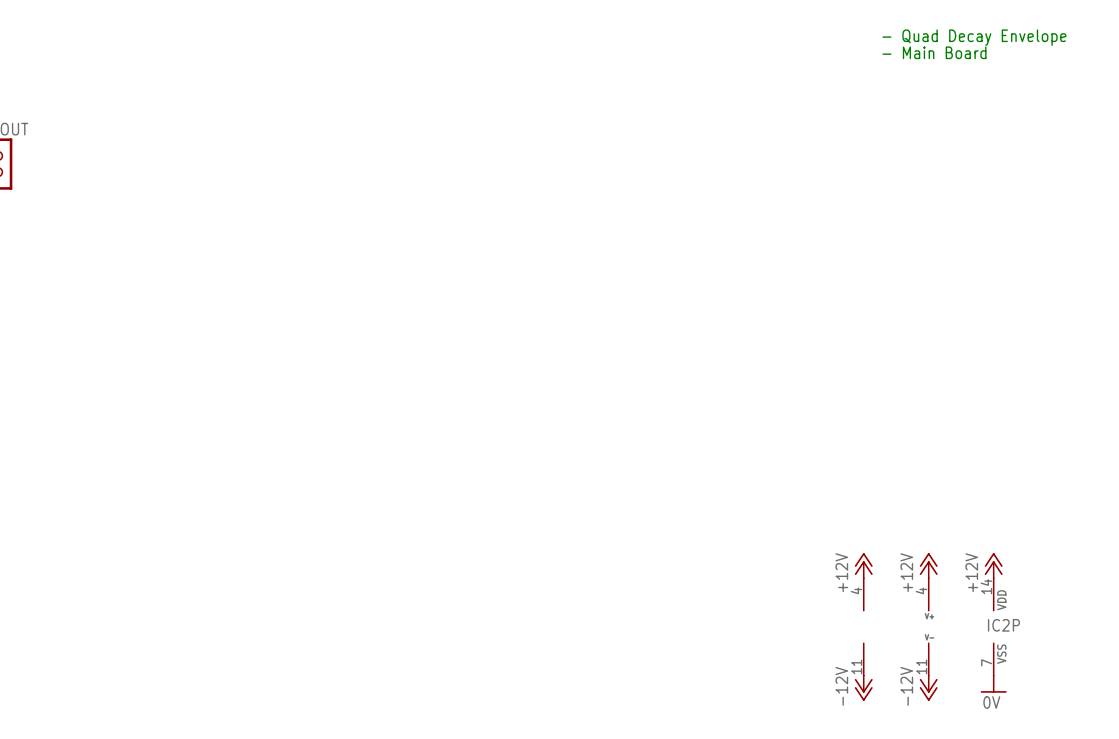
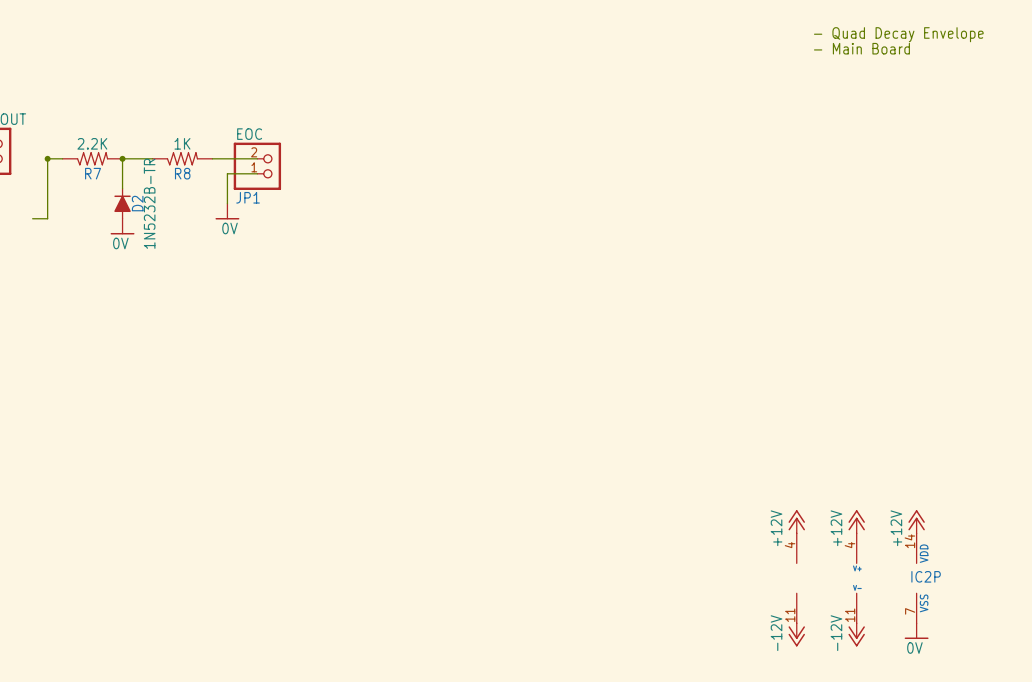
junction: none -> (47, 158)
wire: none -> (62, 158) (47, 158) (47, 218) (32, 218)
R7: none -> 2.2K (92, 158)
junction: none -> (122, 158)
wire: none -> (152, 158) (122, 158) (122, 188)
R8: none -> 1K (182, 158)
wire: none -> (212, 158) (257, 158)
JP1: none -> EOC (257, 166)
wire: none -> (257, 173) (227, 173) (227, 203)
D2: none -> 1N5232B-TR (122, 203)
power symbol: none -> 0V (227, 211)
power symbol: none -> 0V (122, 226)

